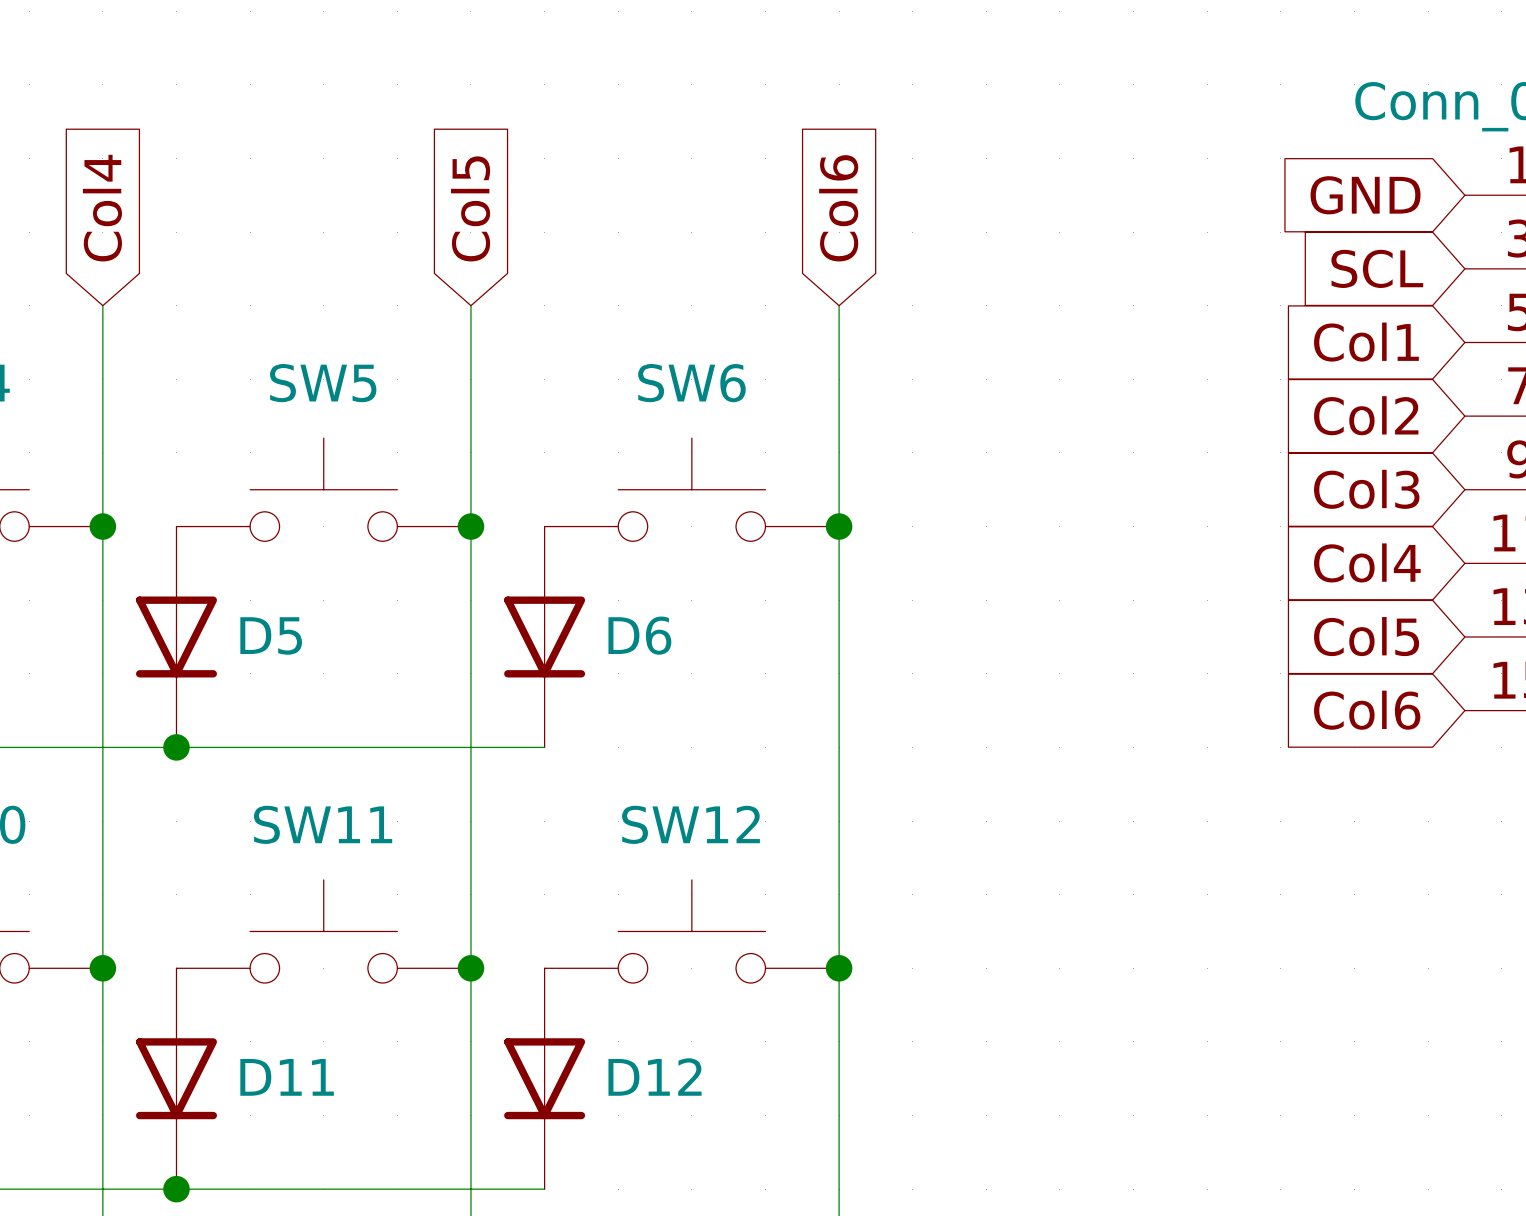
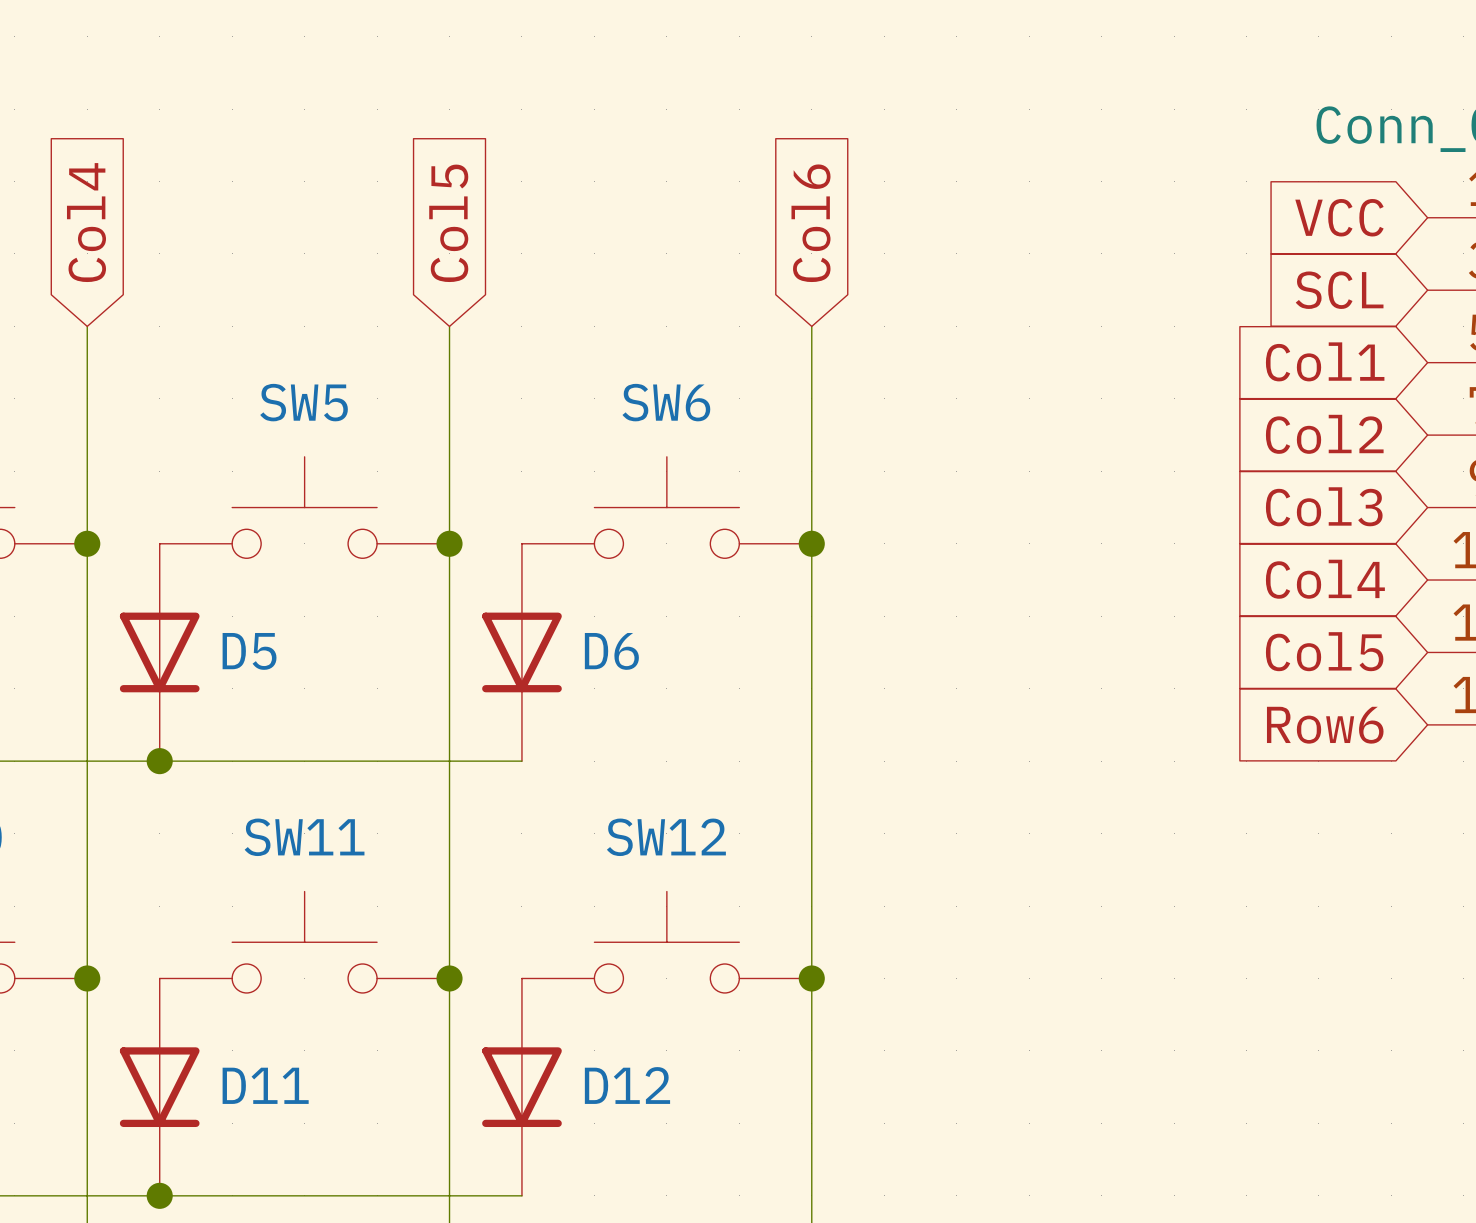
global label: GND (1365, 195) -> VCC (1339, 217)
global label: Col6 (1367, 710) -> Row6 (1325, 725)

